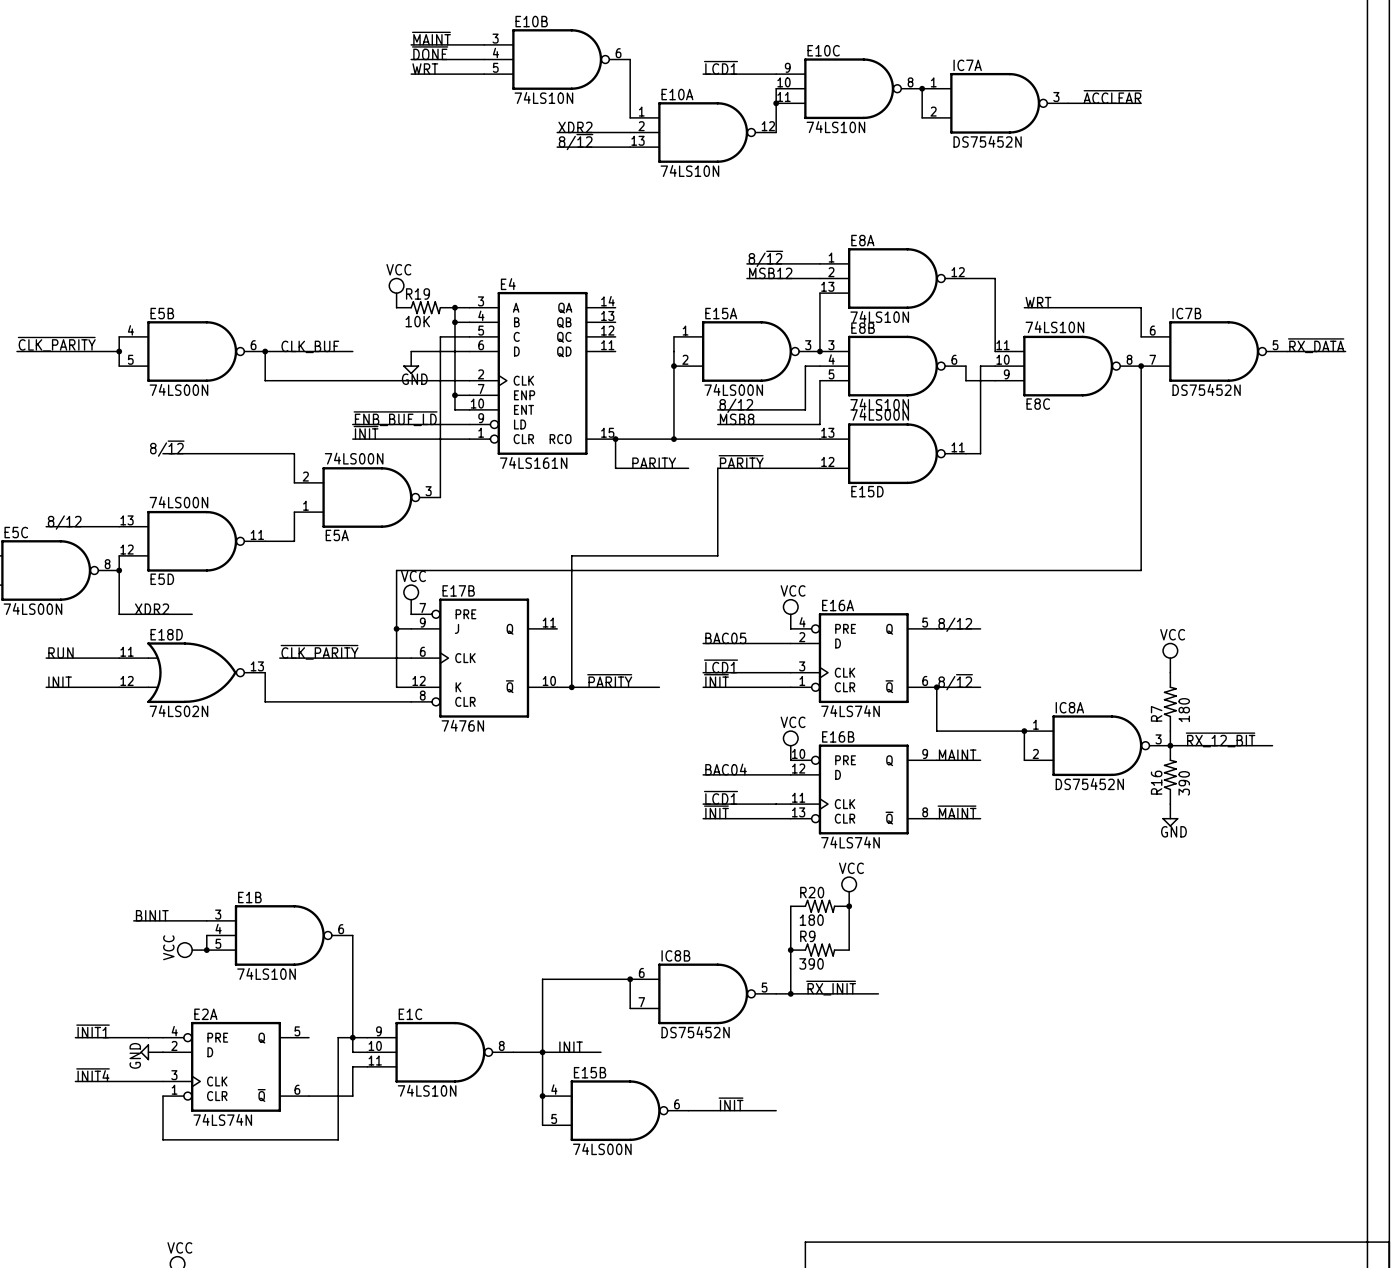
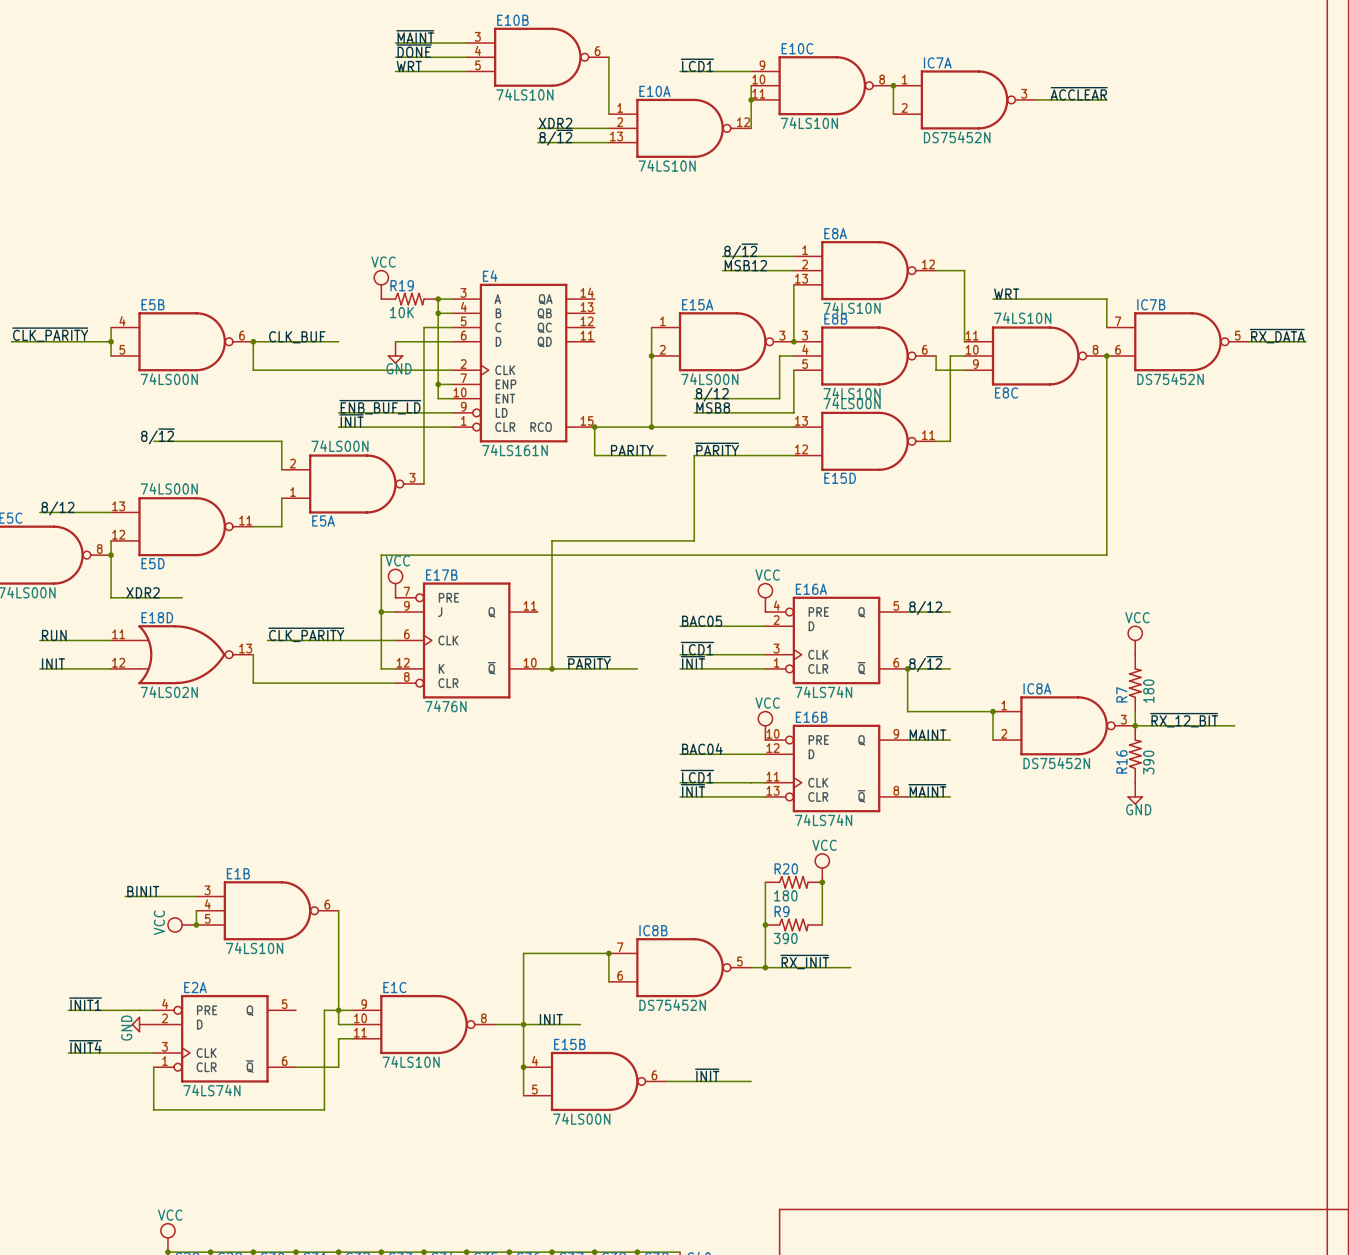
IC7B flip: as is (1214, 351) -> up-down (1177, 341)
IC8B flip: as is (703, 993) -> up-down (680, 967)

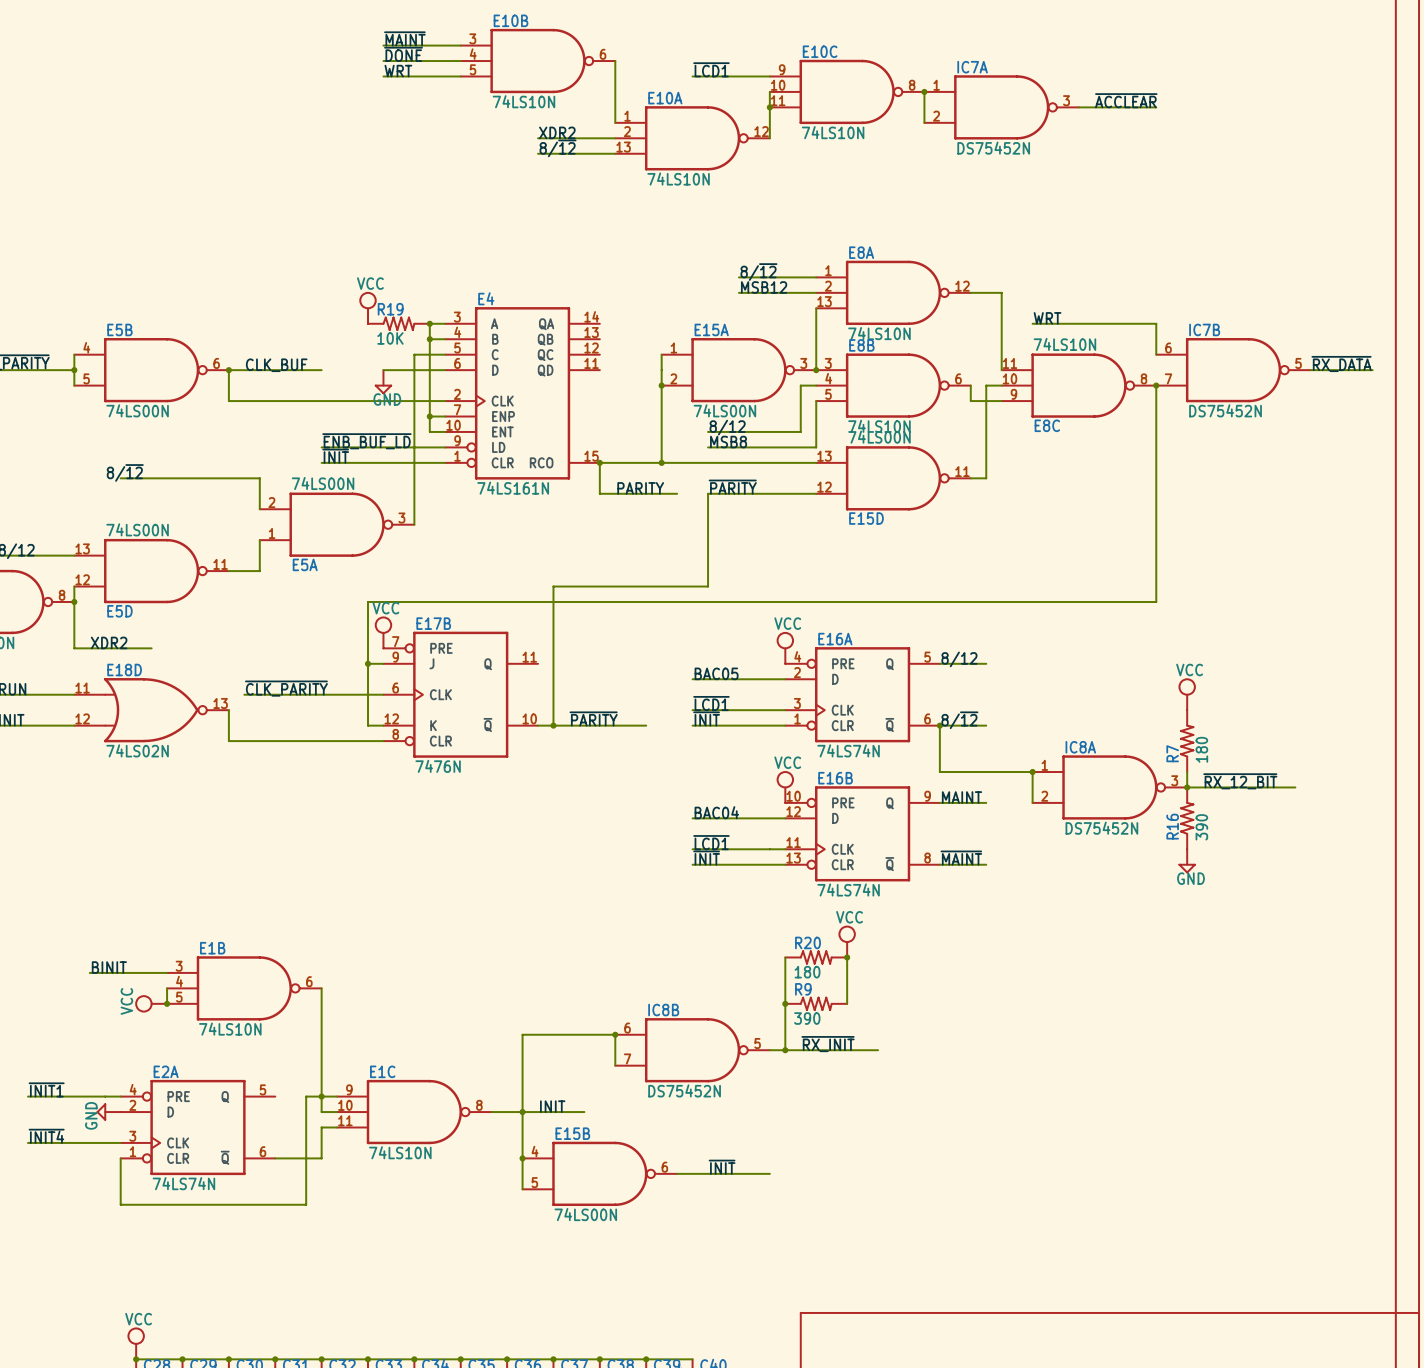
IC7B flip: as is (1177, 341) -> up-down (1233, 370)
IC8B flip: as is (680, 967) -> up-down (692, 1050)

